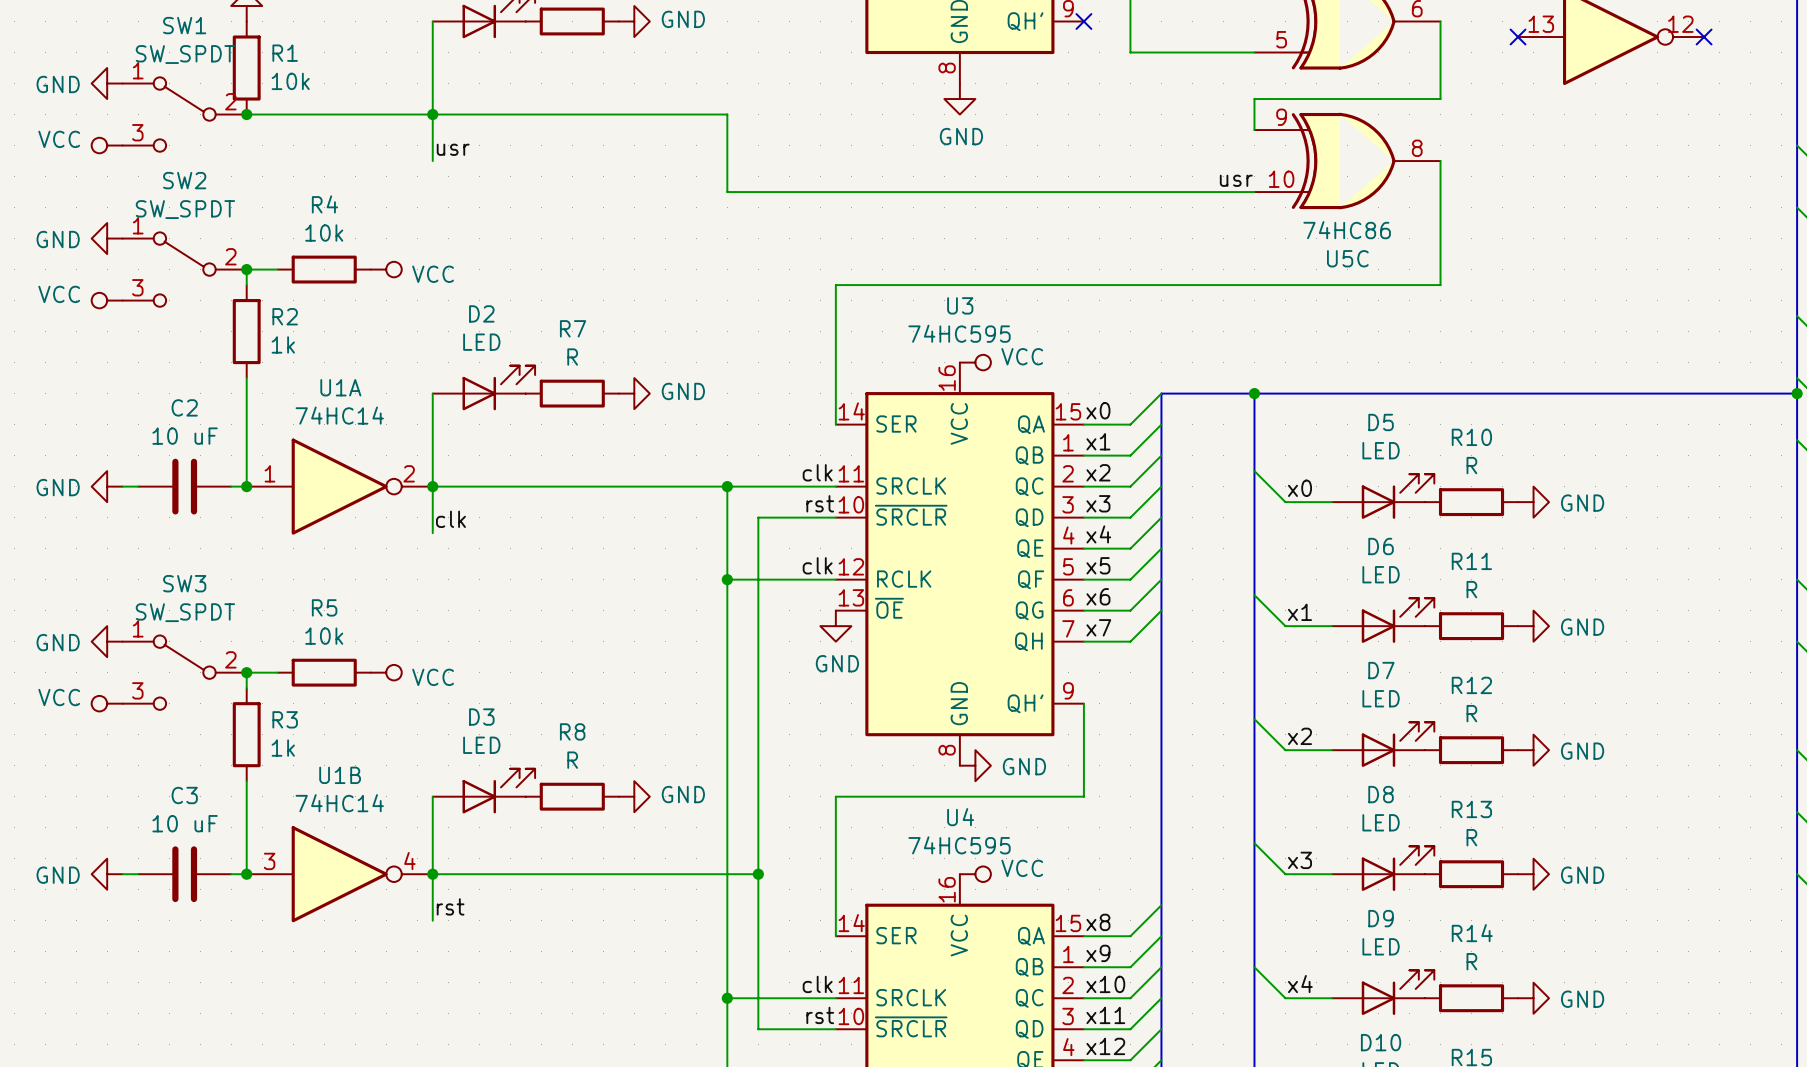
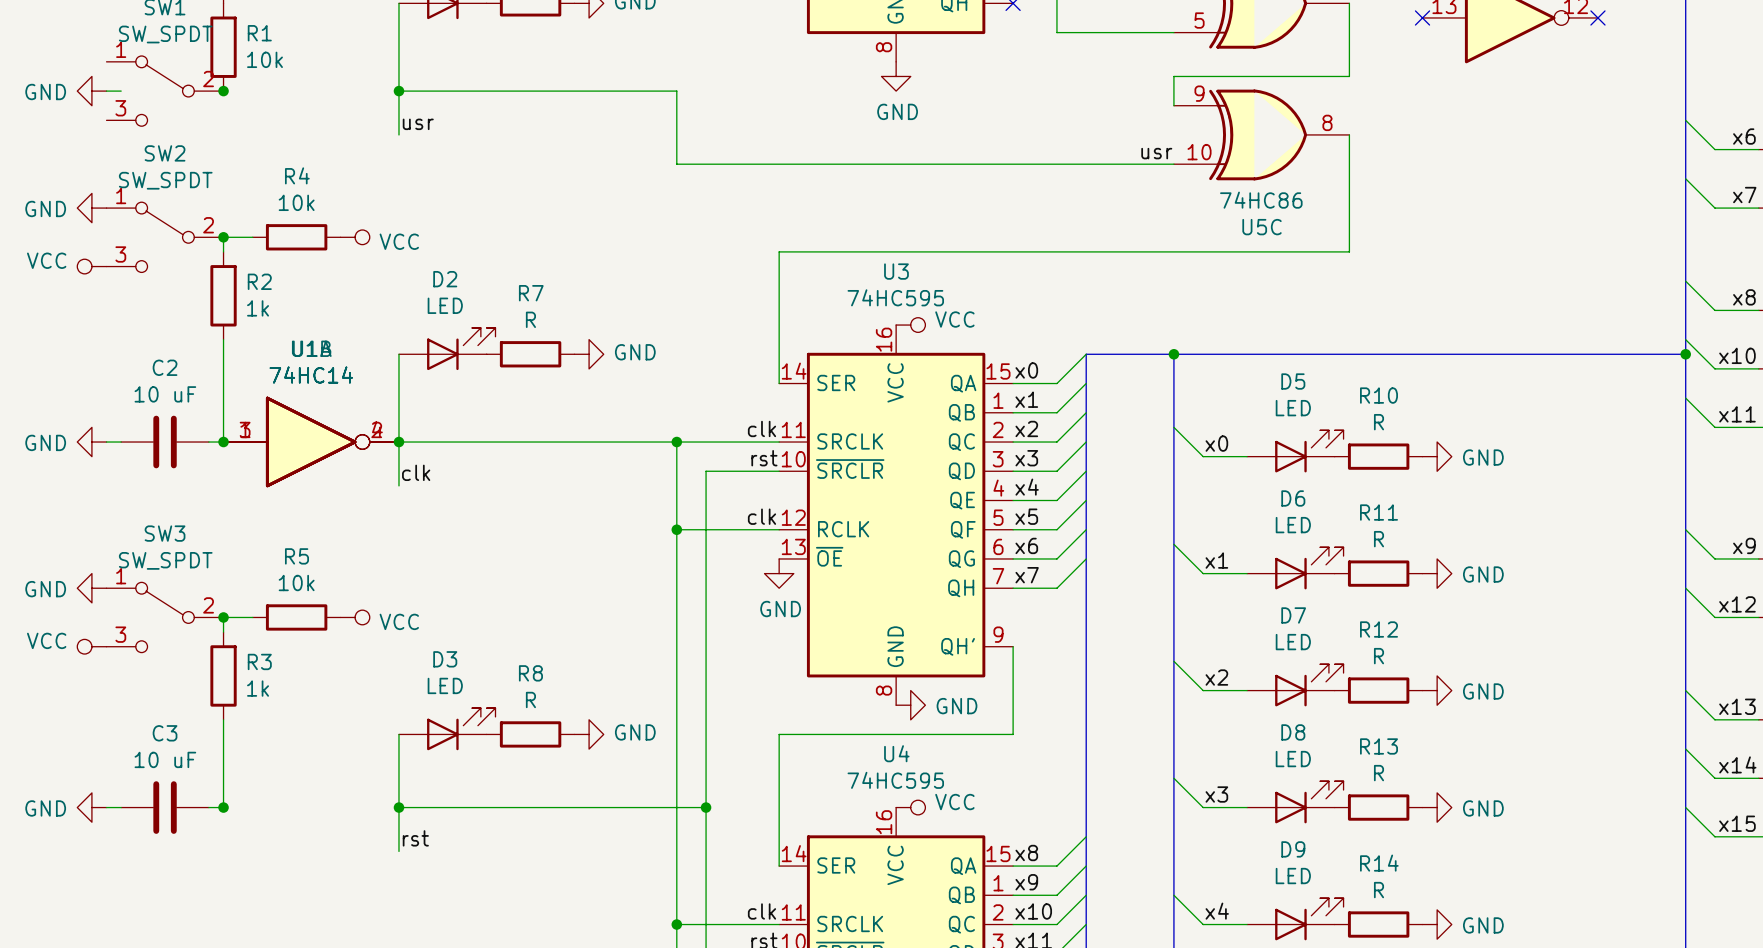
power symbol position: GND (107, 83) -> GND (91, 91)
wire: none -> (106, 91) (121, 91)
wire: (246, 114) (432, 114) -> none
power symbol: VCC (107, 145) -> none
U1B position: (339, 874) -> (311, 442)

